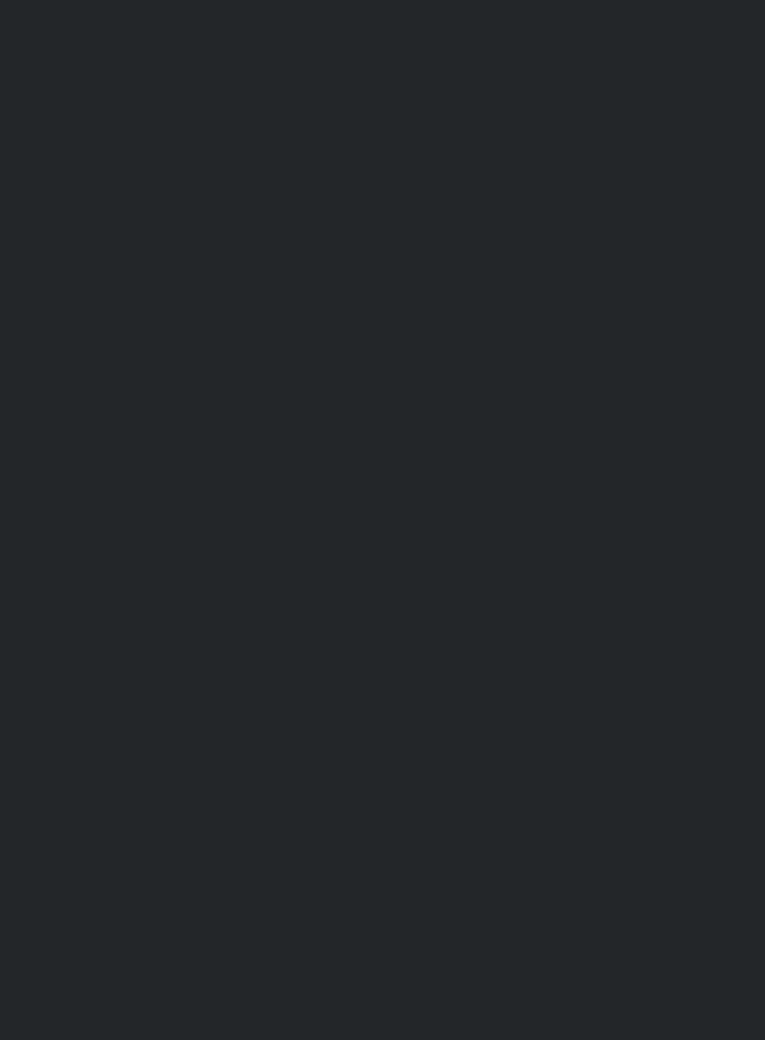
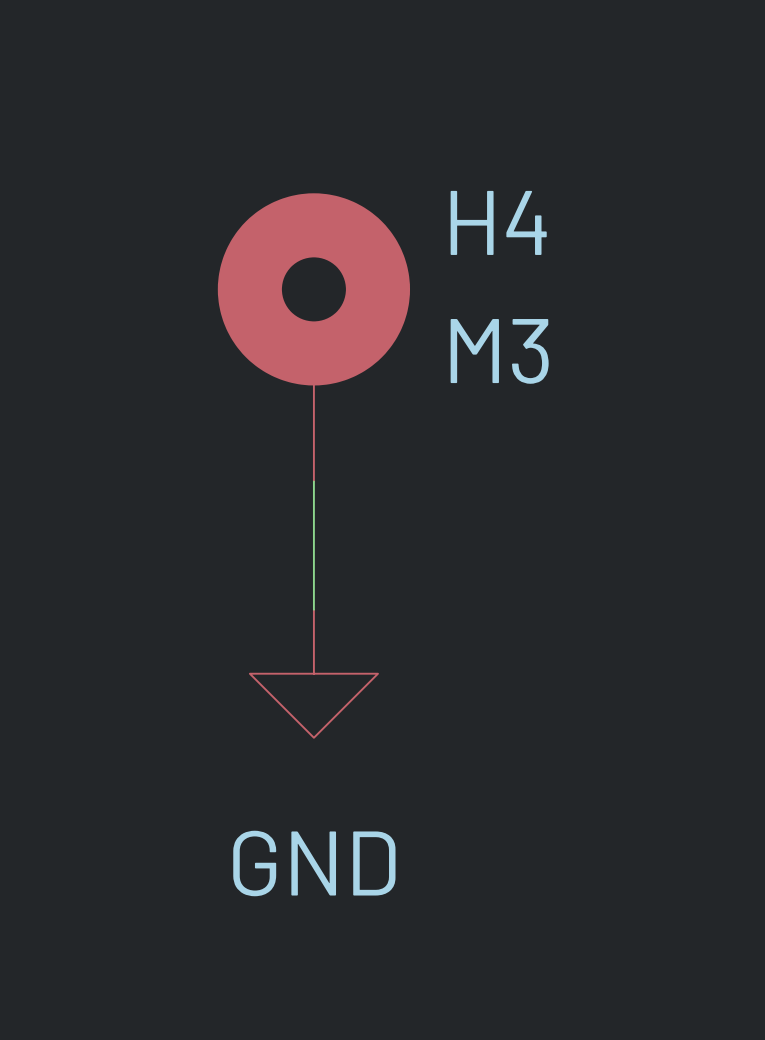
H4: none -> M3 (313, 337)
wire: none -> (313, 481) (313, 609)
power symbol: none -> GND (313, 673)

